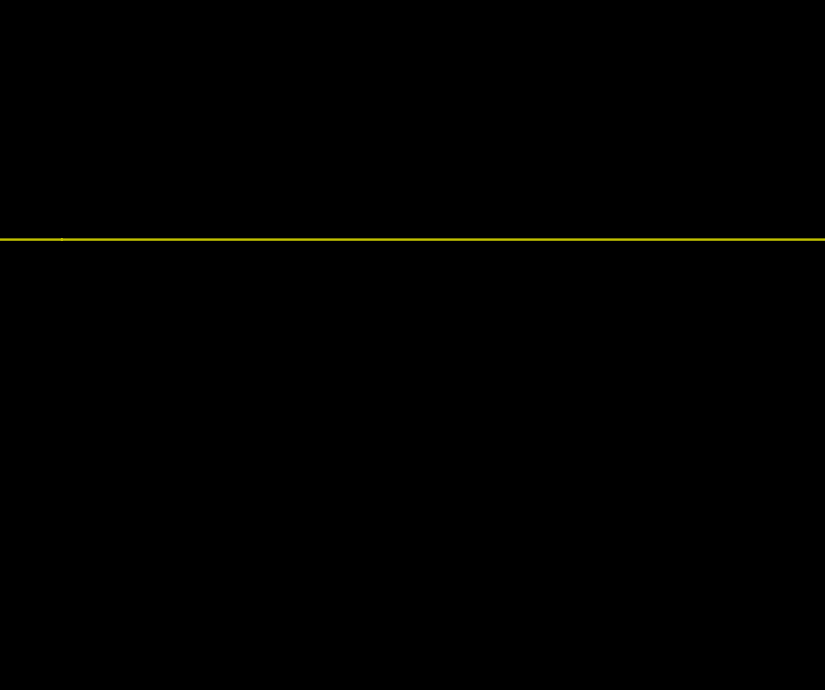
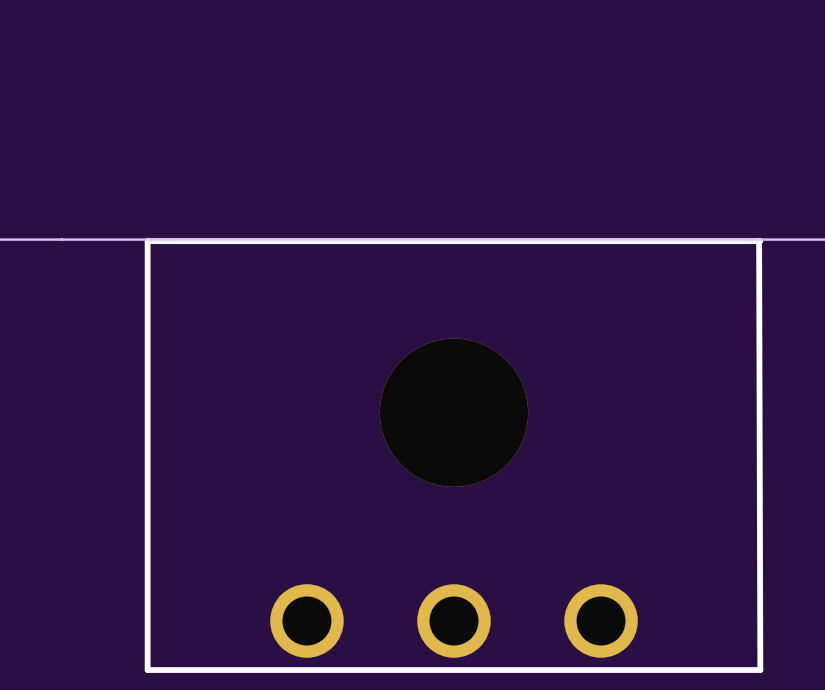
part: none -> (453, 455)

